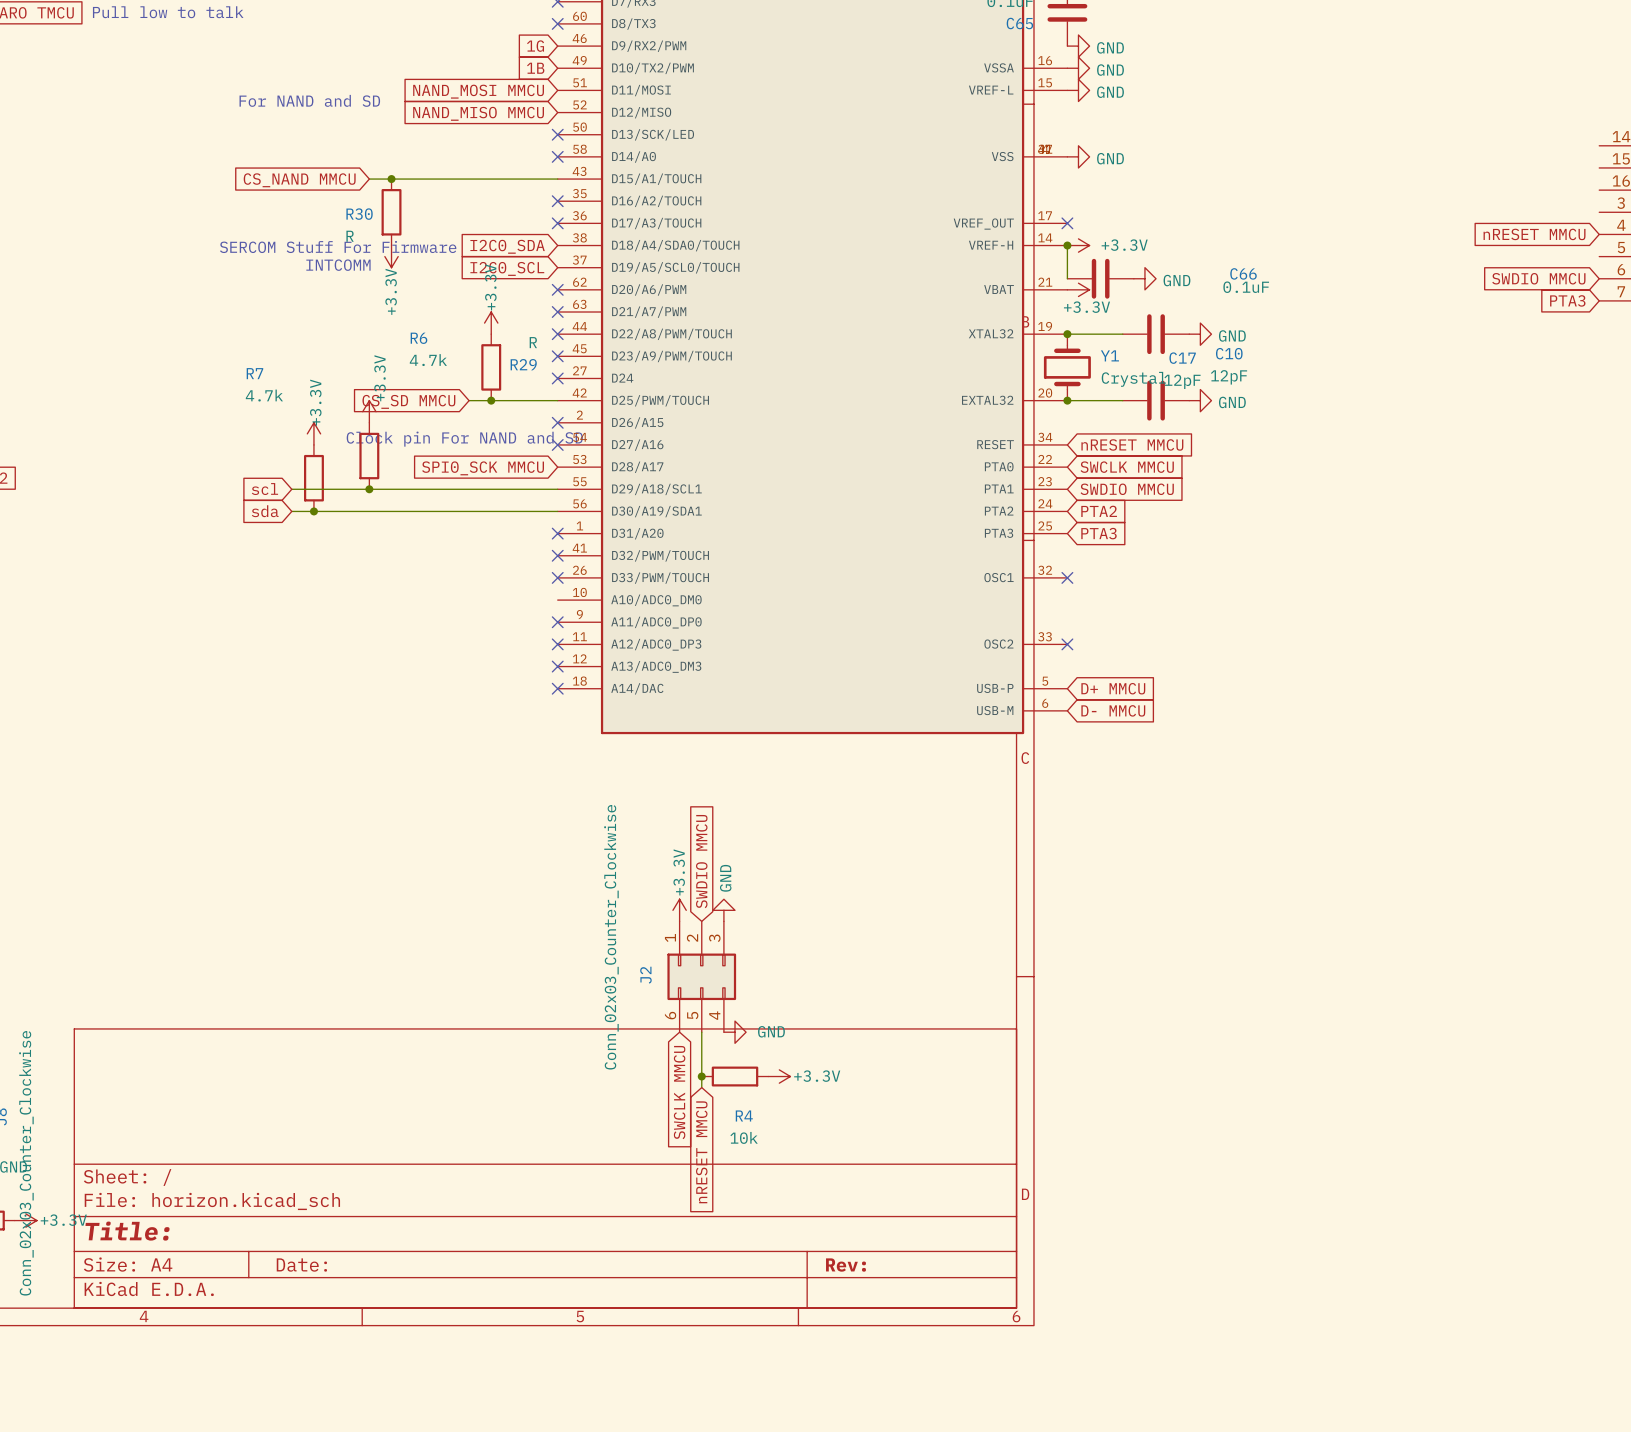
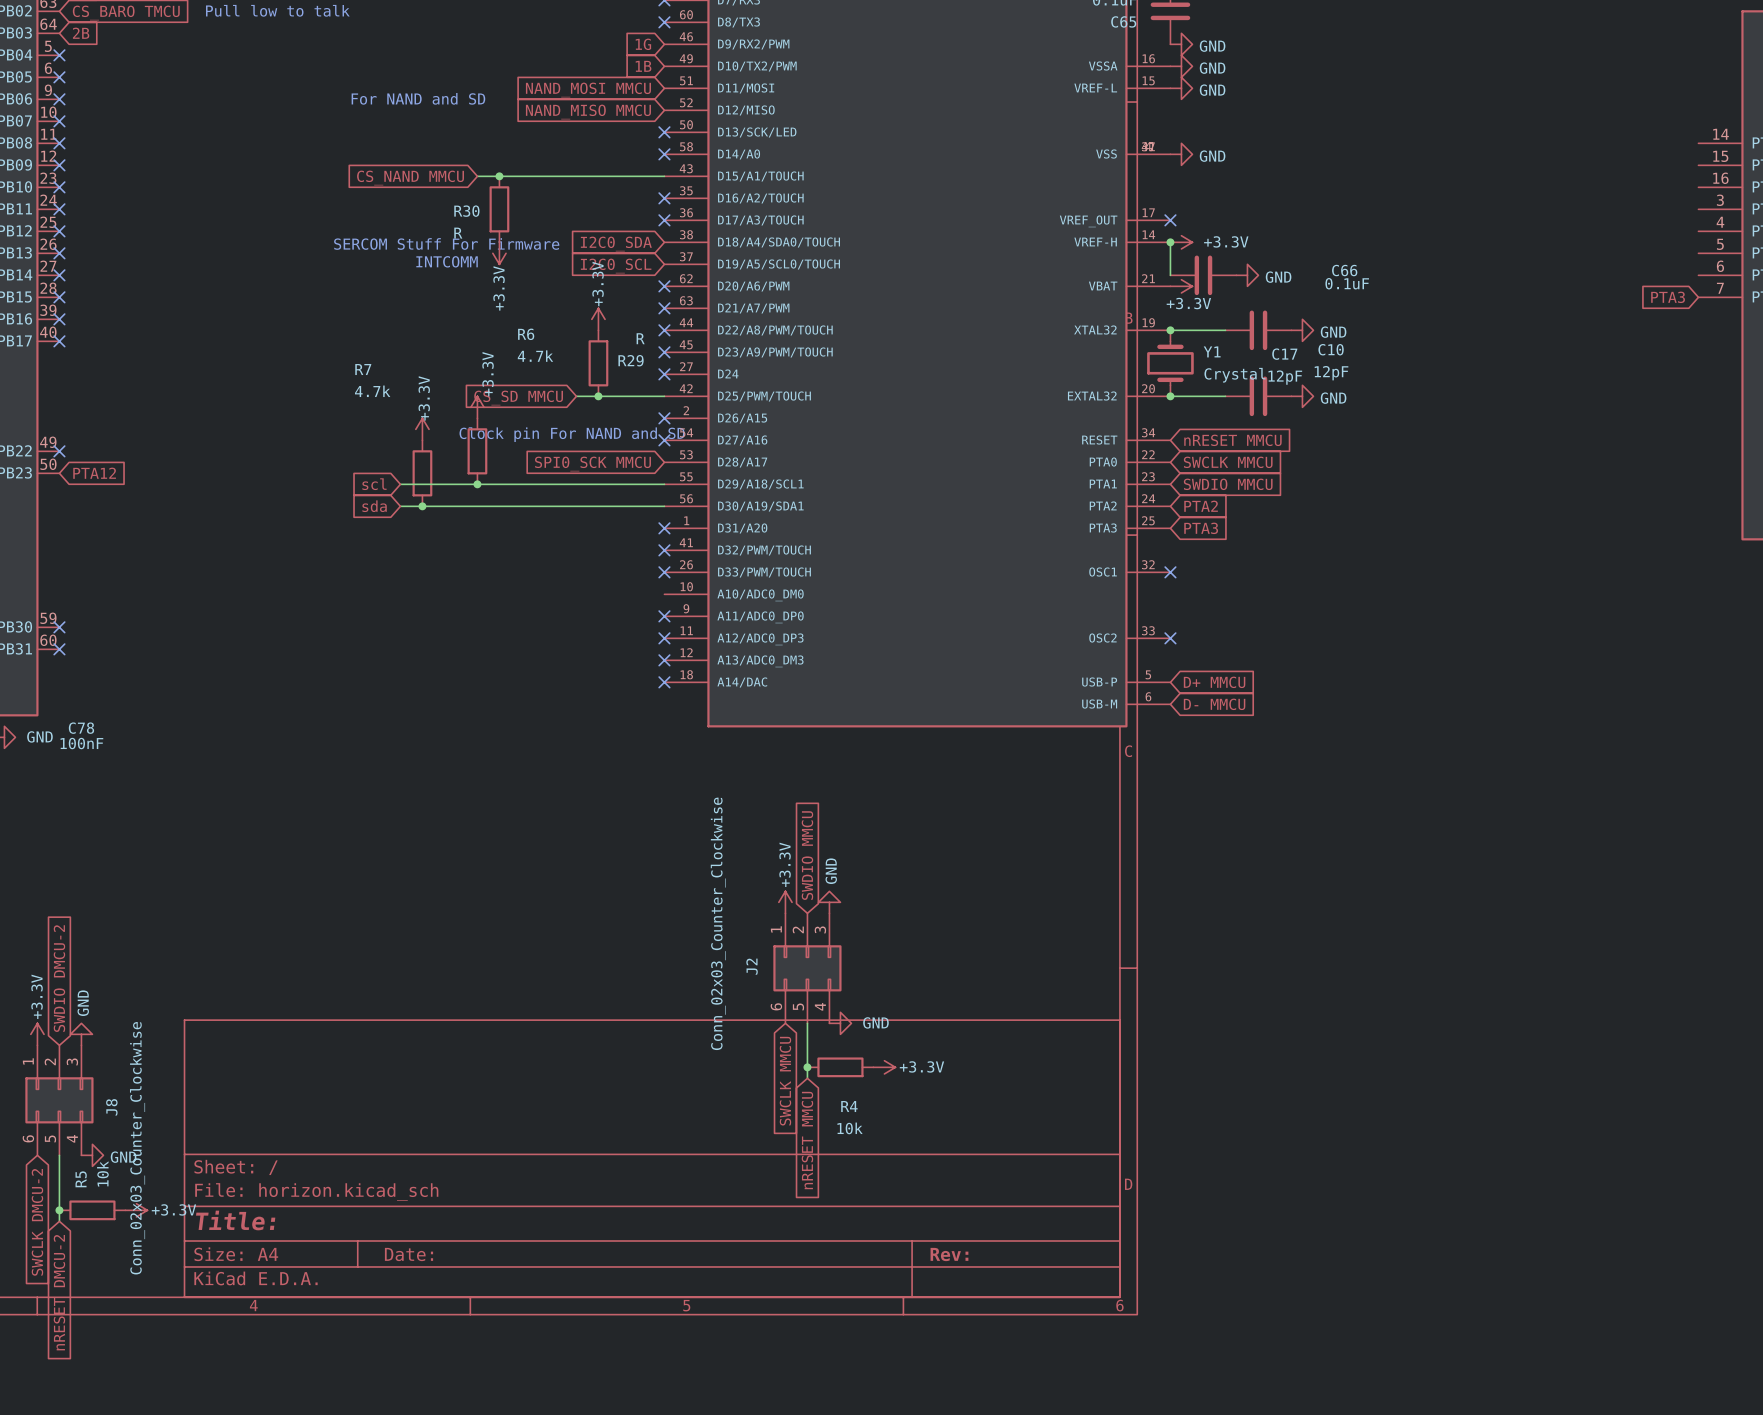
global label: nRESET MMCU (1534, 234) -> none
global label: SWDIO MMCU (1538, 278) -> none

